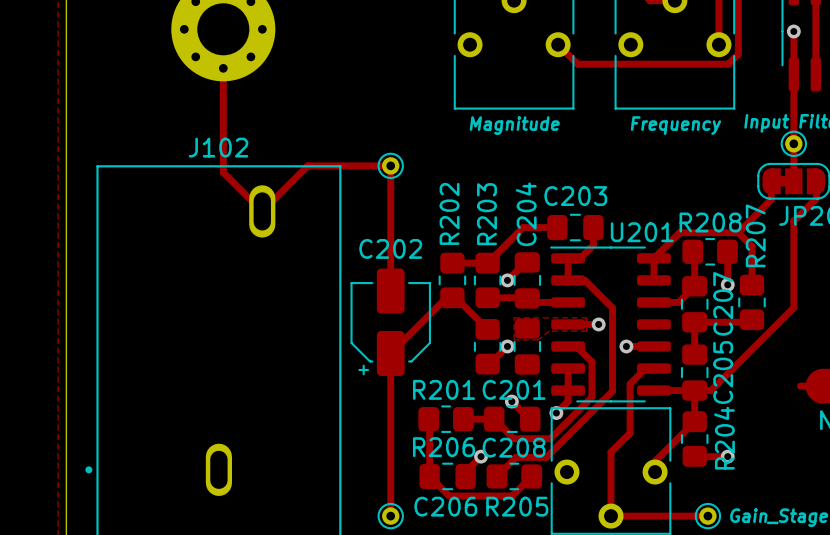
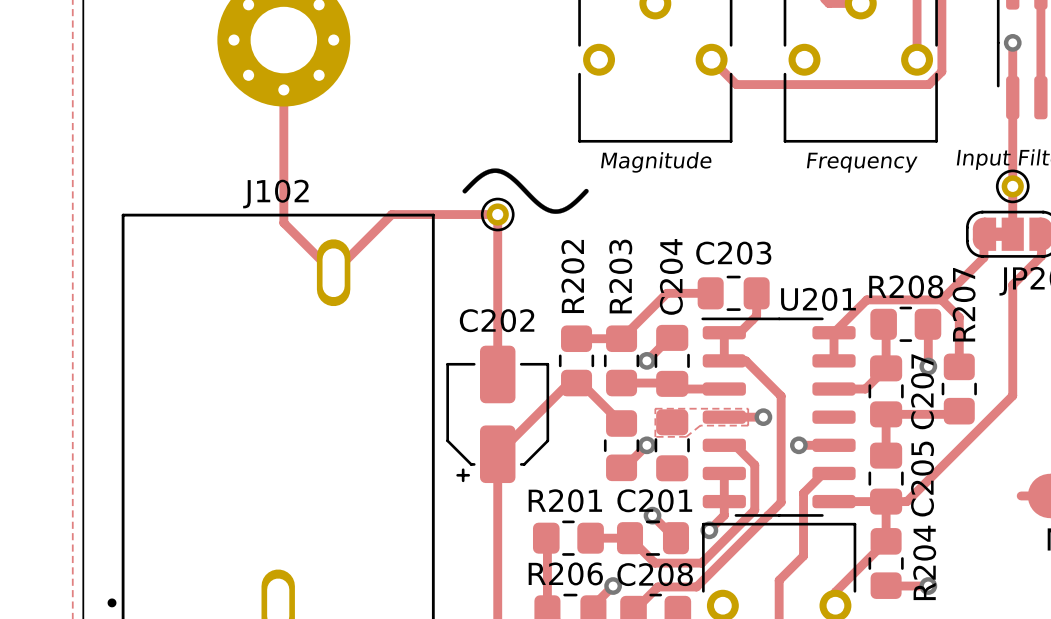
drawing: none -> [462, 168, 589, 214]

